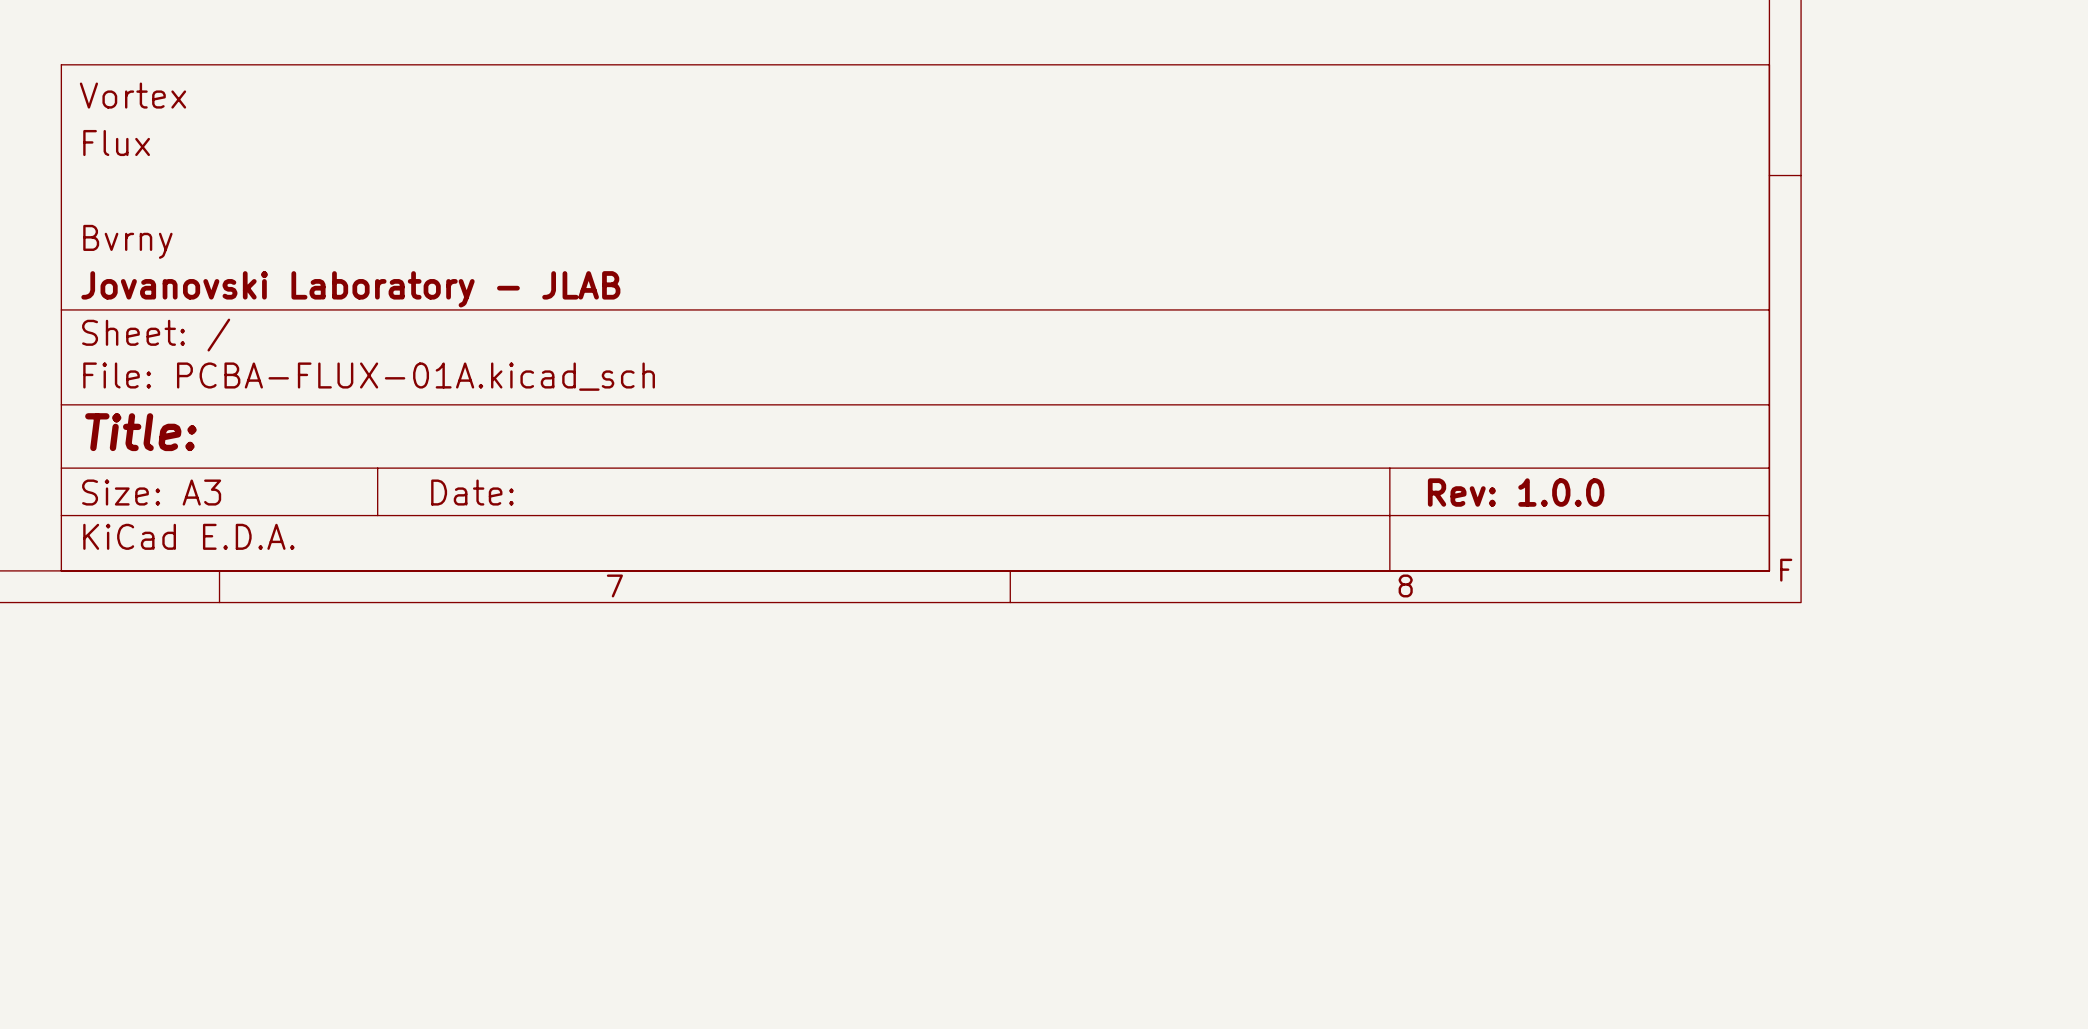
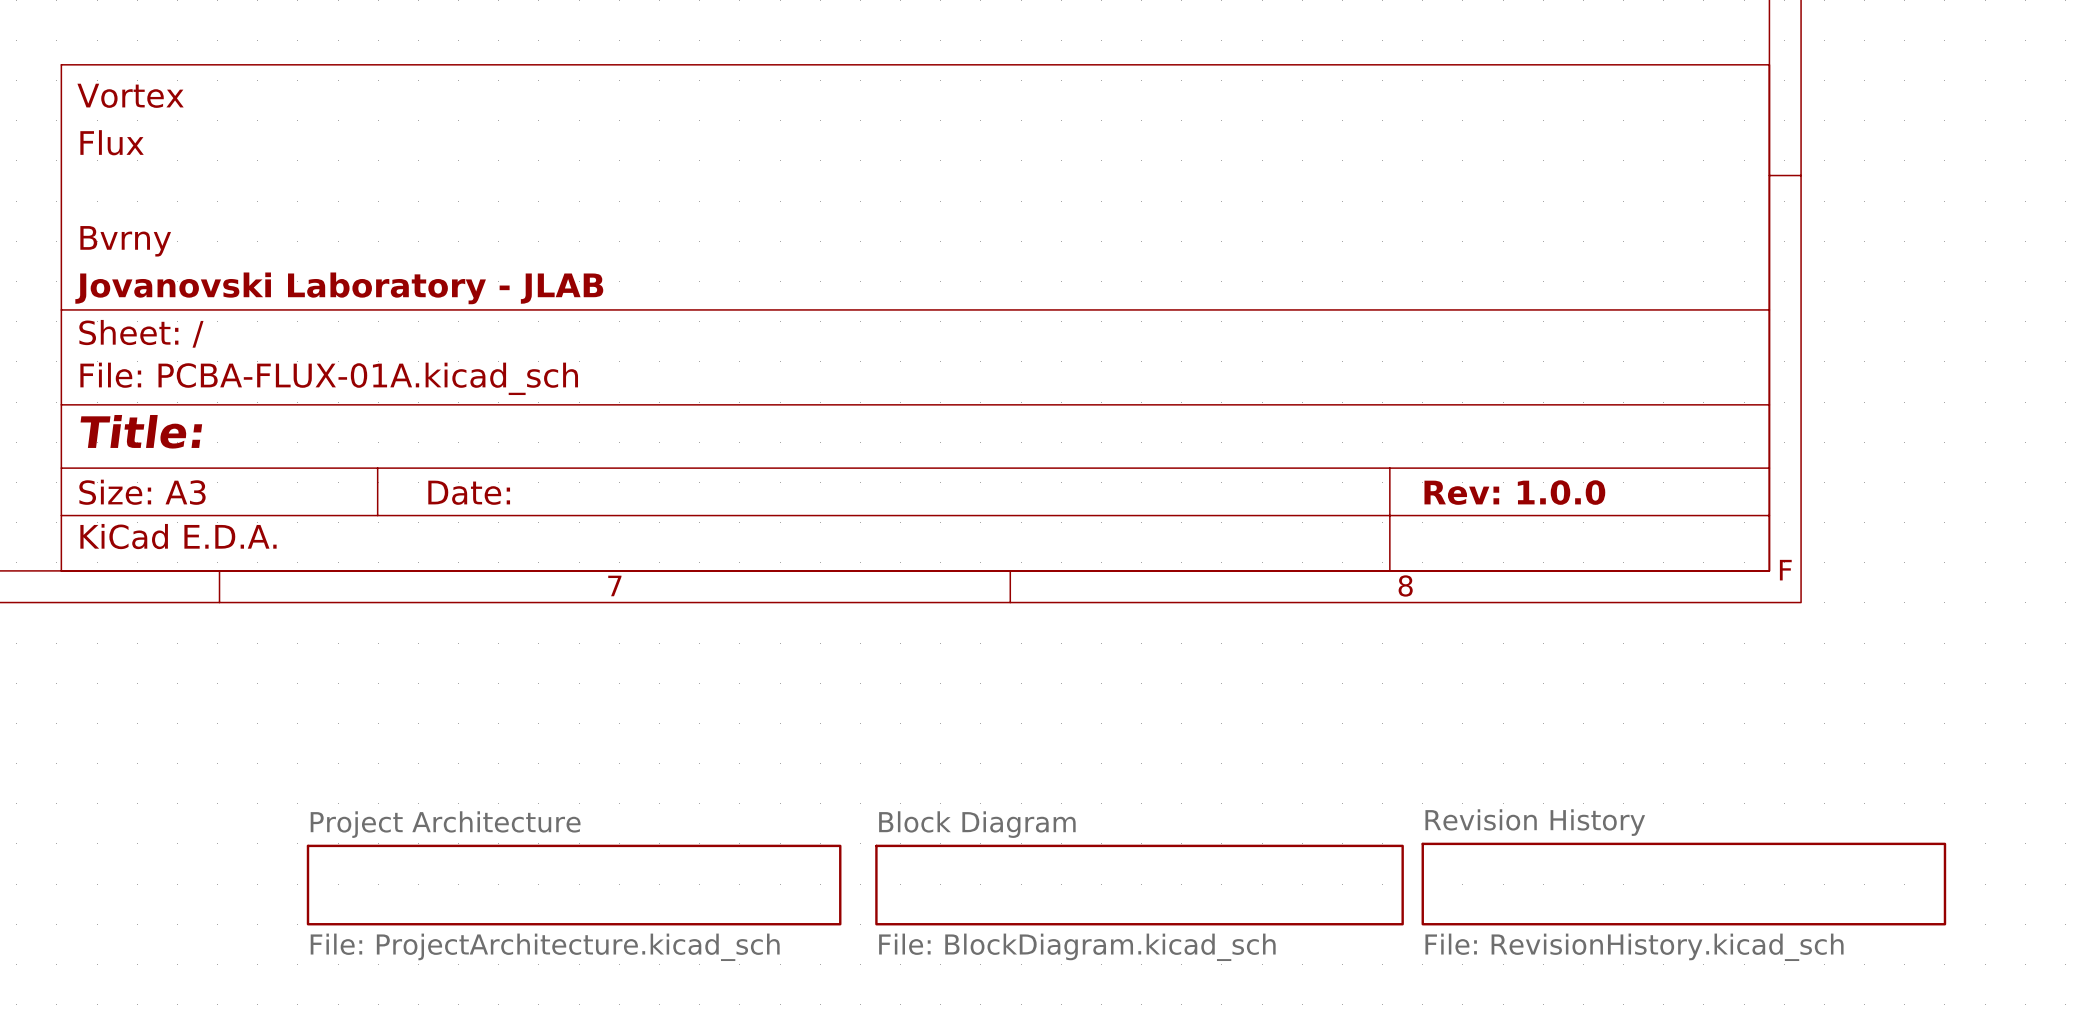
sheet Revision History: none -> File: RevisionHistory.kicad_sch (1683, 884)
sheet Project Architecture: none -> File: ProjectArchitecture.kicad_sch (574, 885)
sheet Block Diagram: none -> File: BlockDiagram.kicad_sch (1139, 885)

